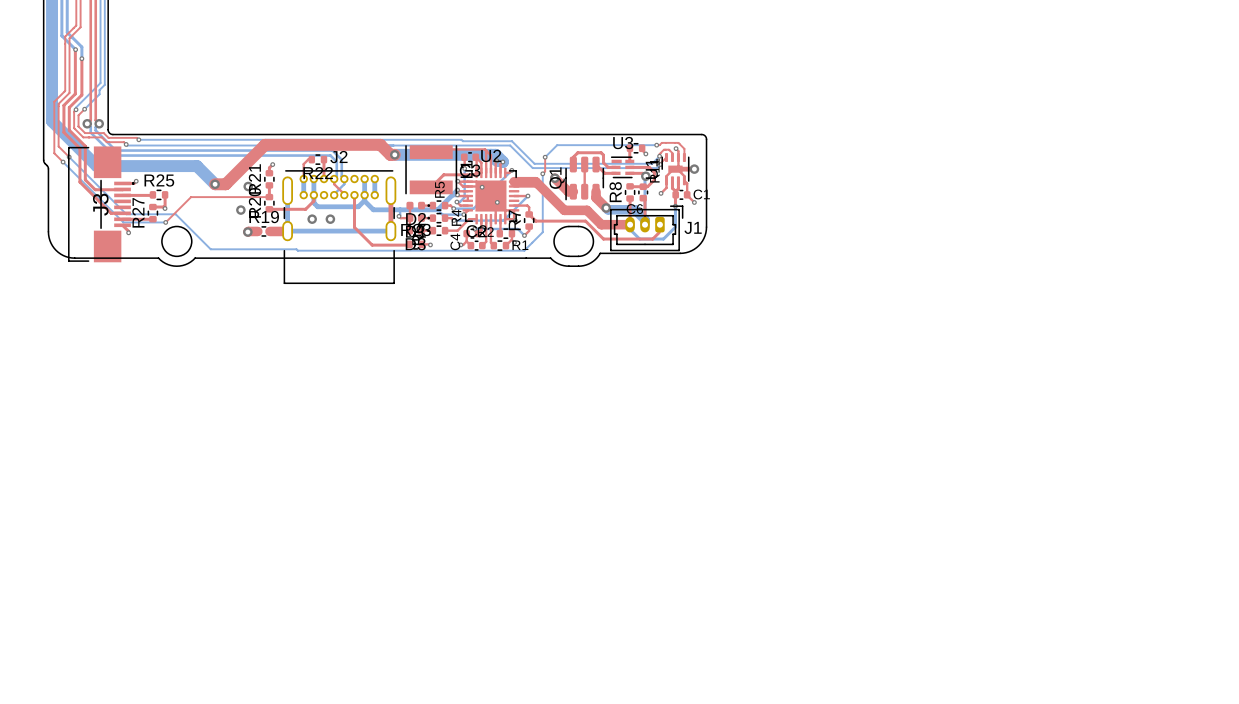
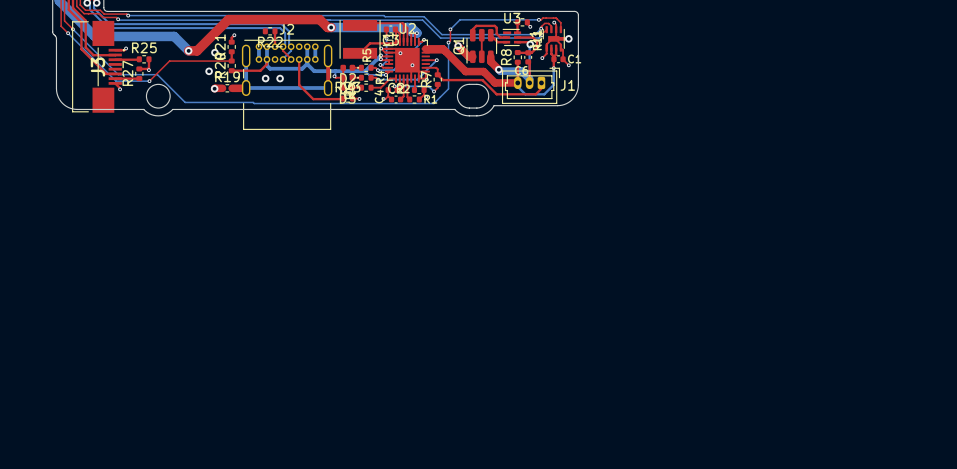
top track: (311, 159) (308, 159) (303, 164) (303, 179) -> none

